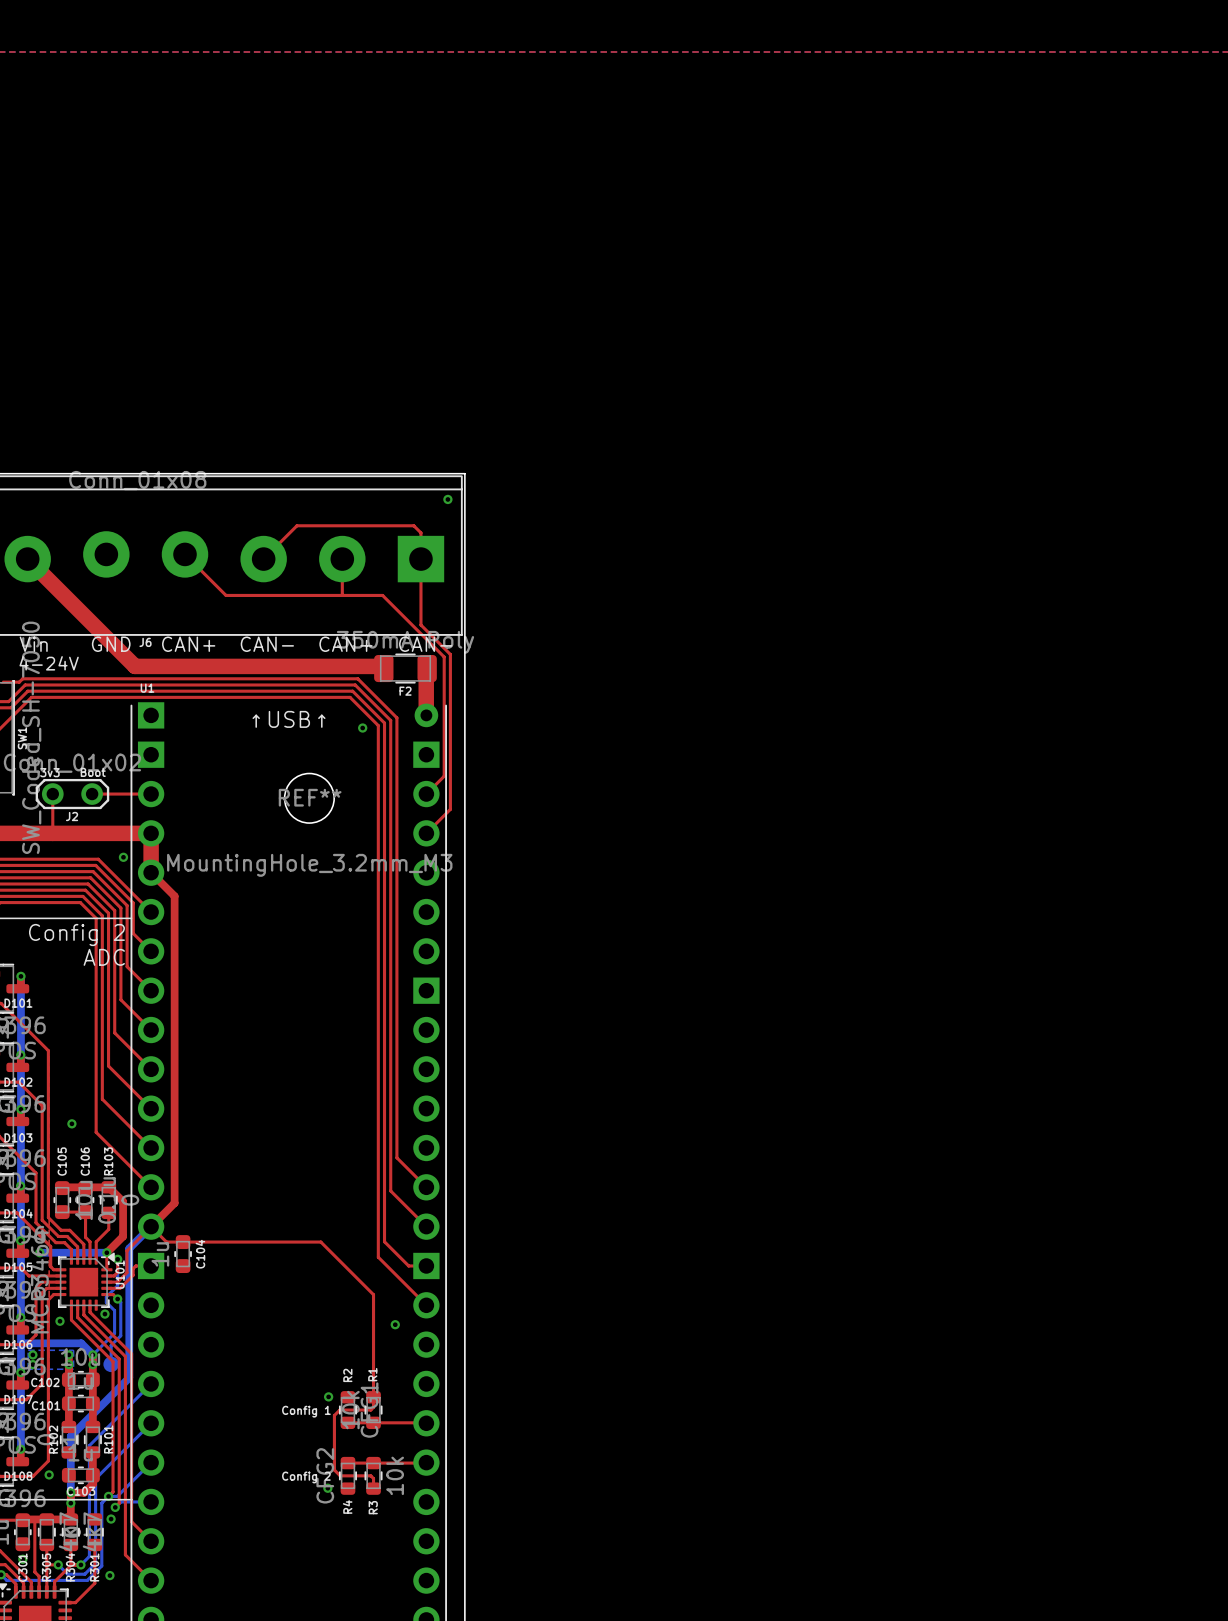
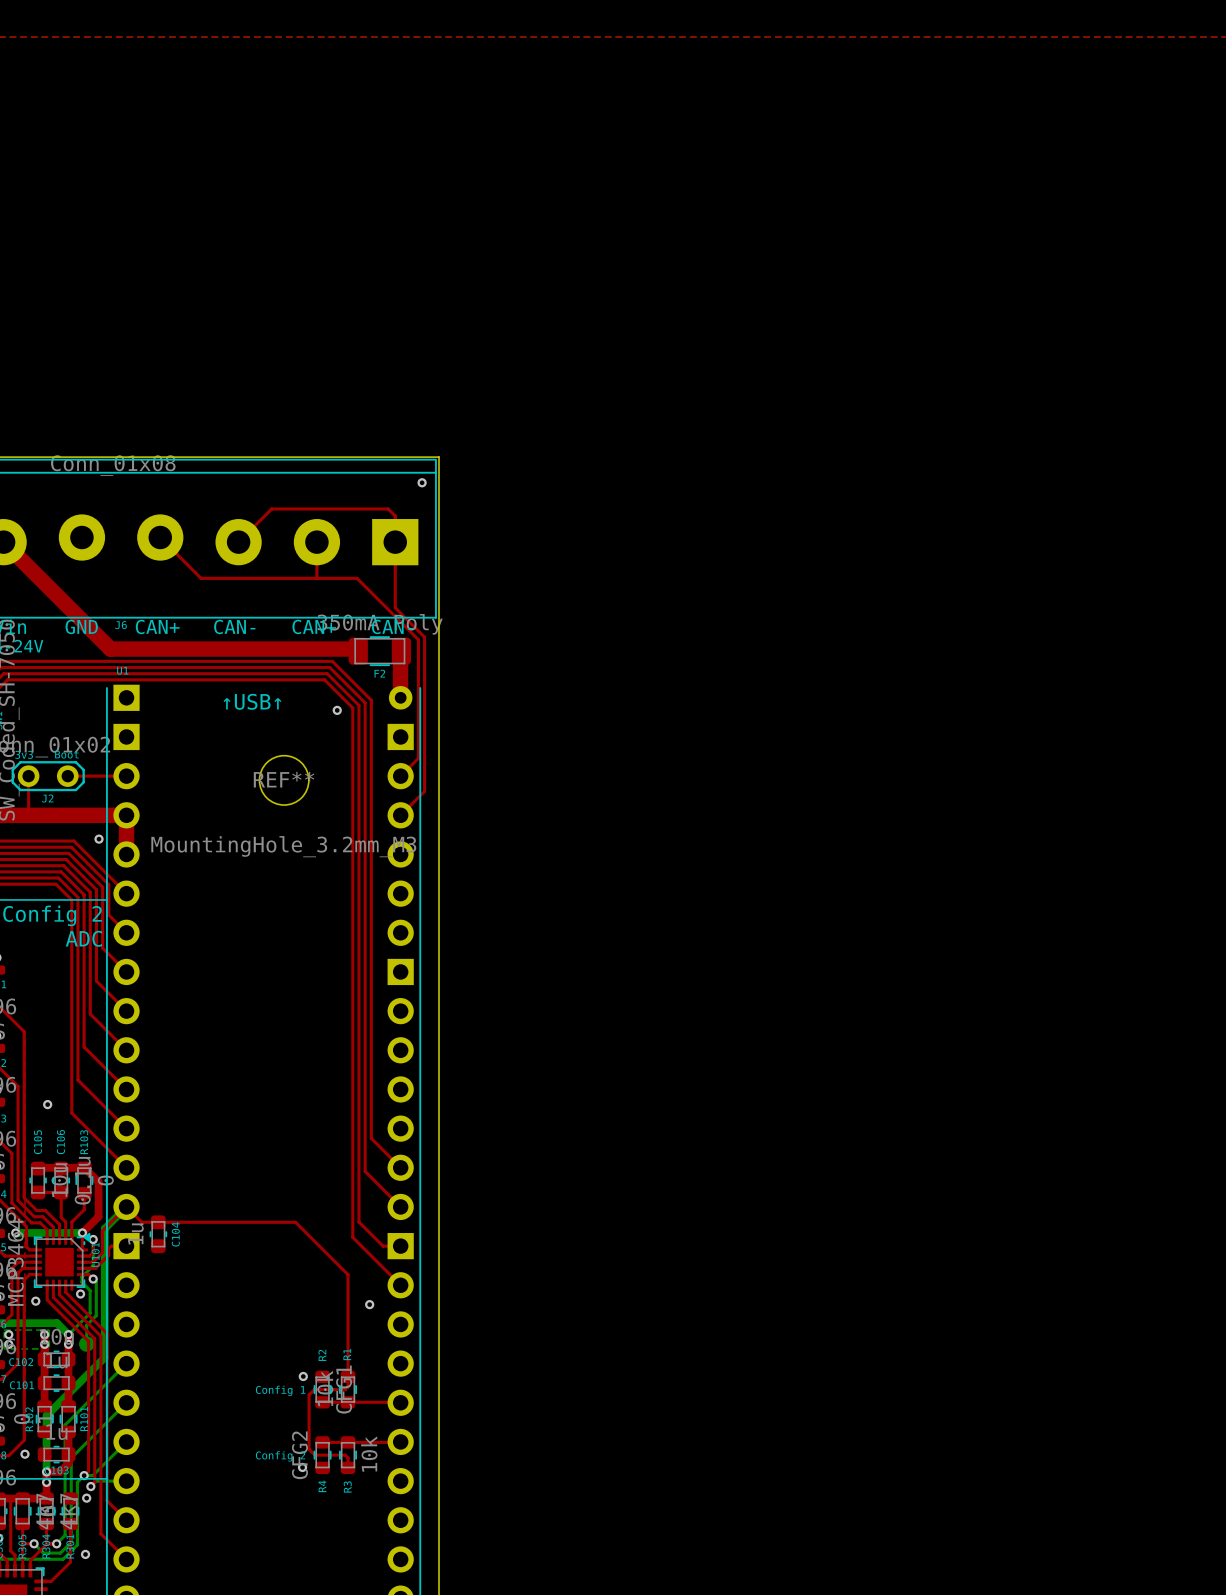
top track: (151, 872) (174, 896) (174, 1203) (151, 1226) -> none

